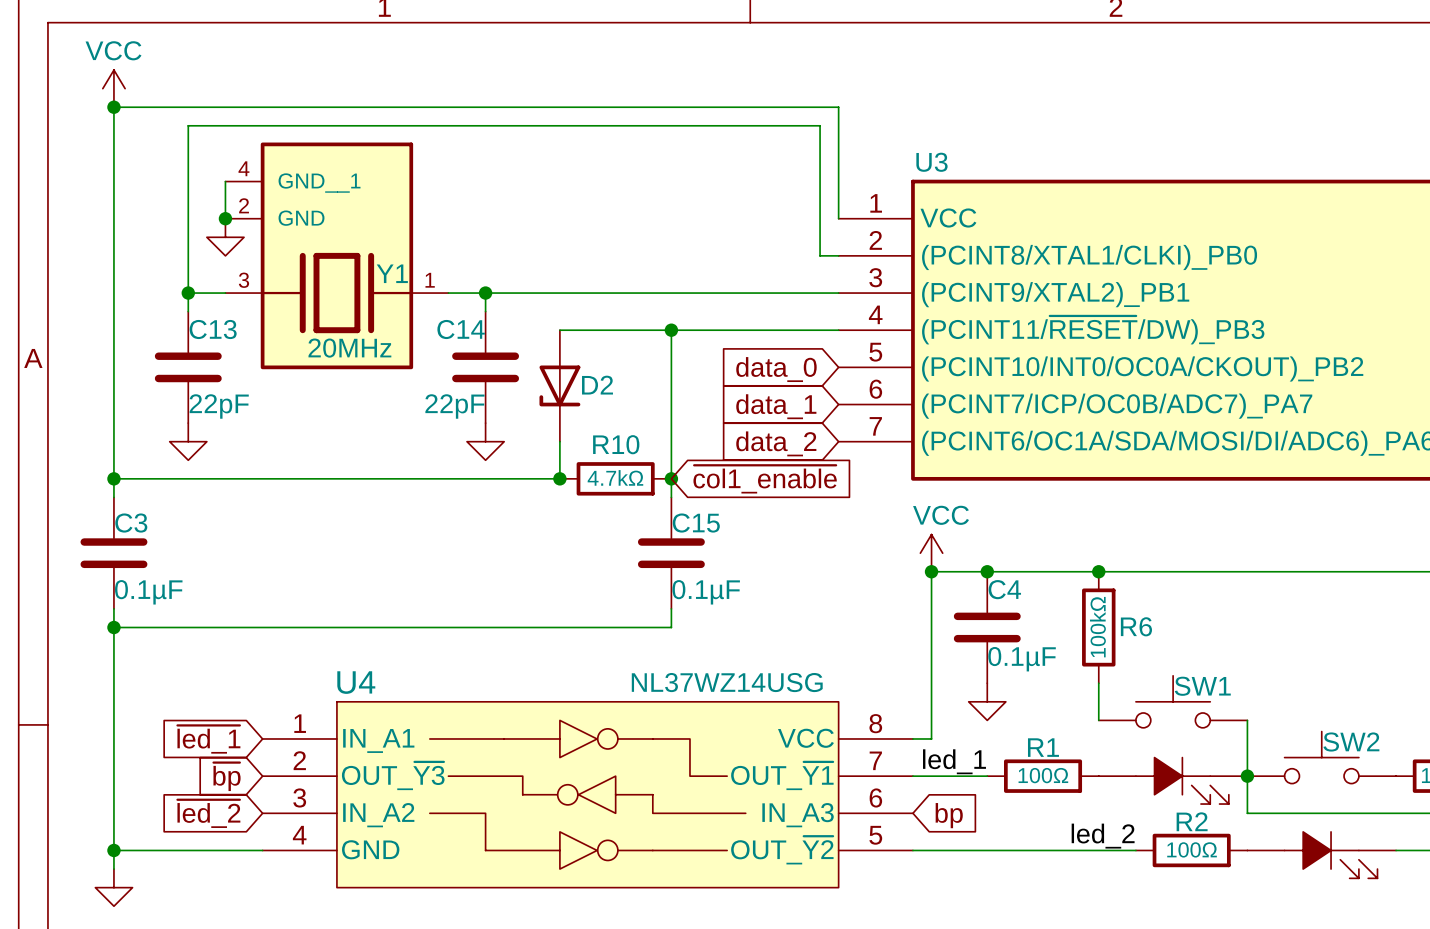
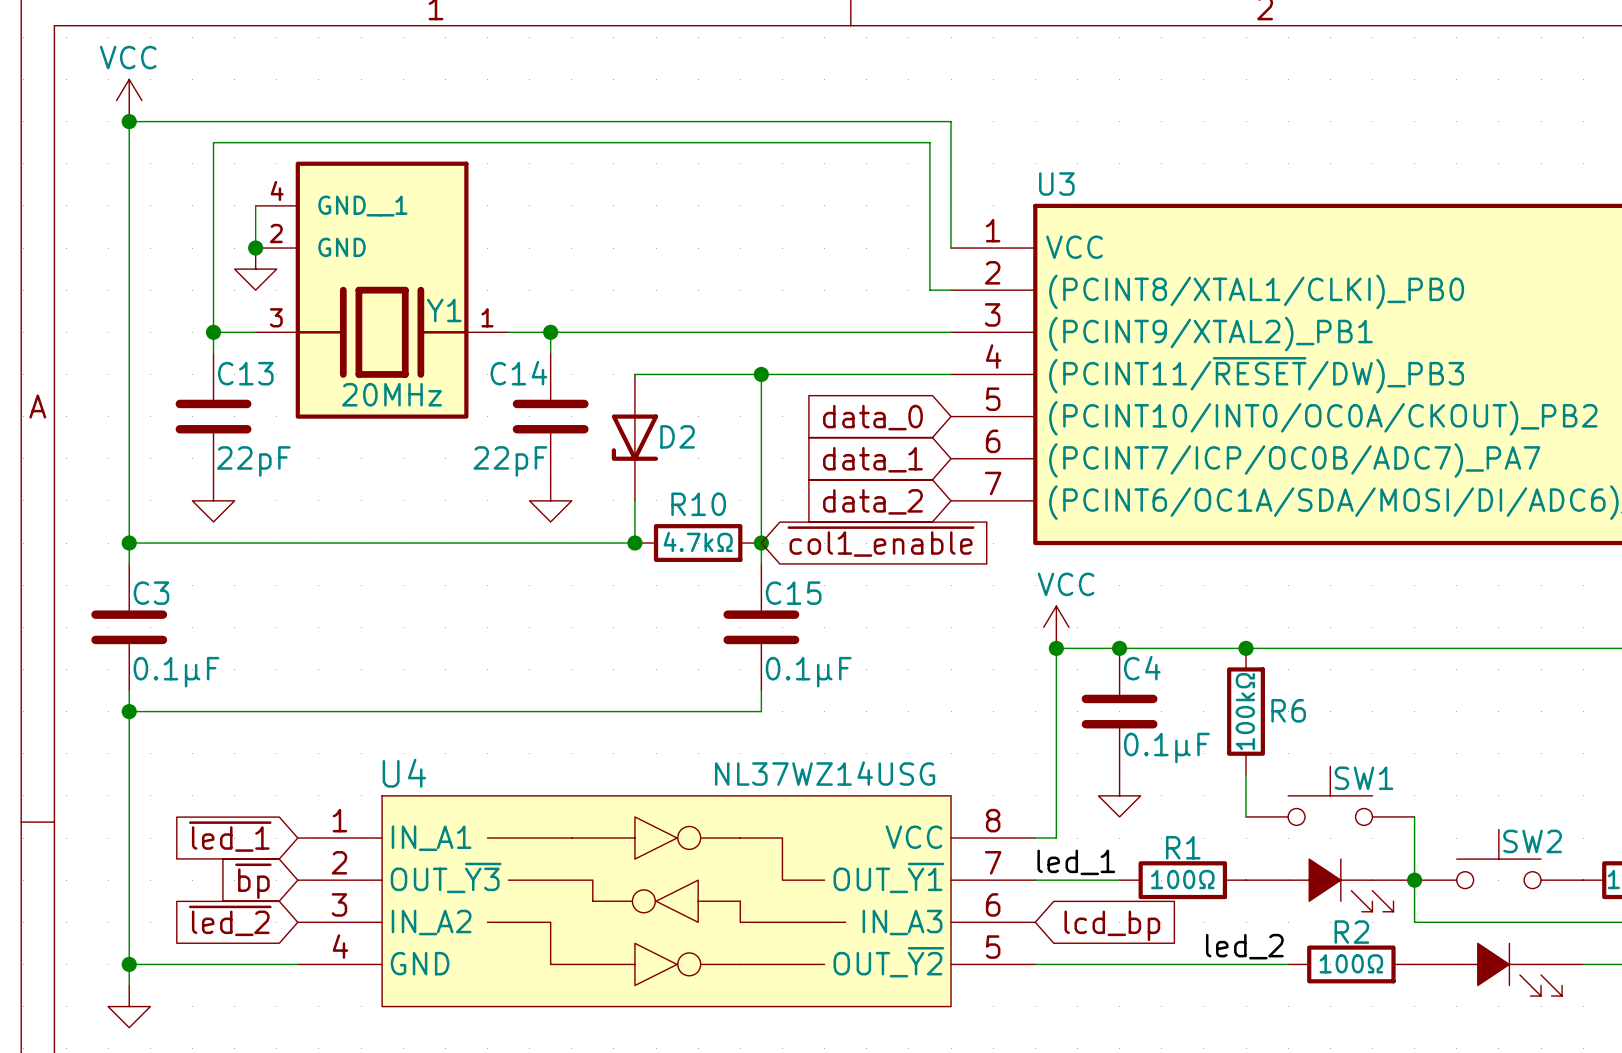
global label: bp (949, 815) -> lcd_bp (1112, 925)

